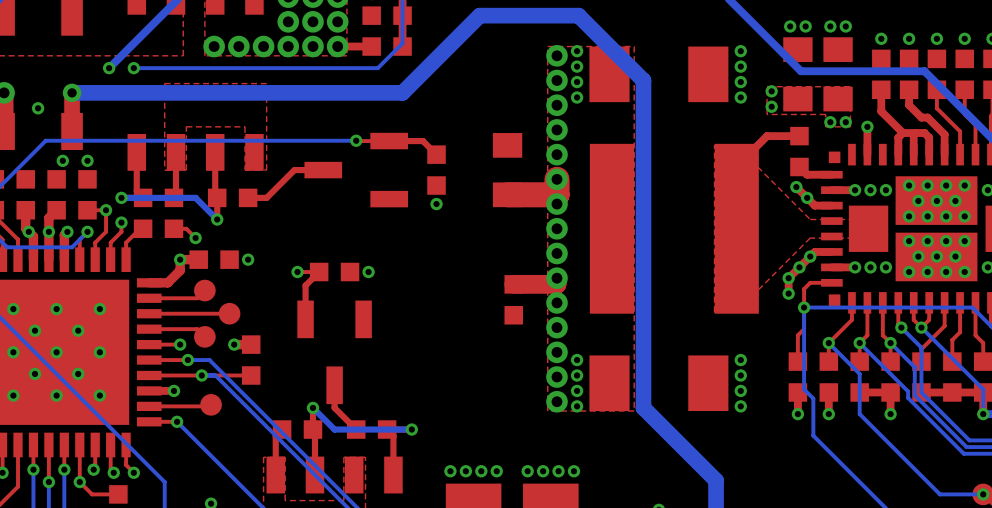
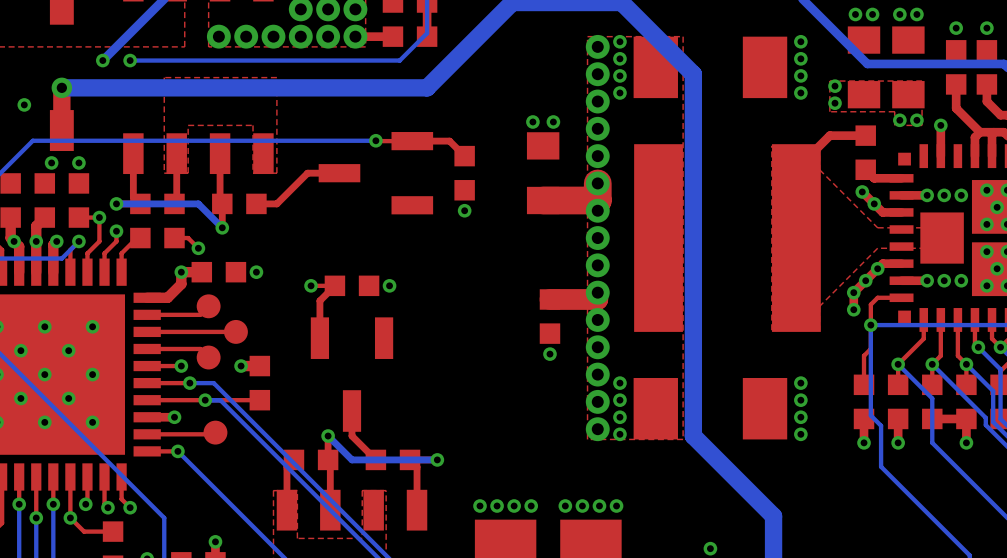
via: none -> (532, 121)
via: none -> (553, 121)
via: none -> (549, 354)

